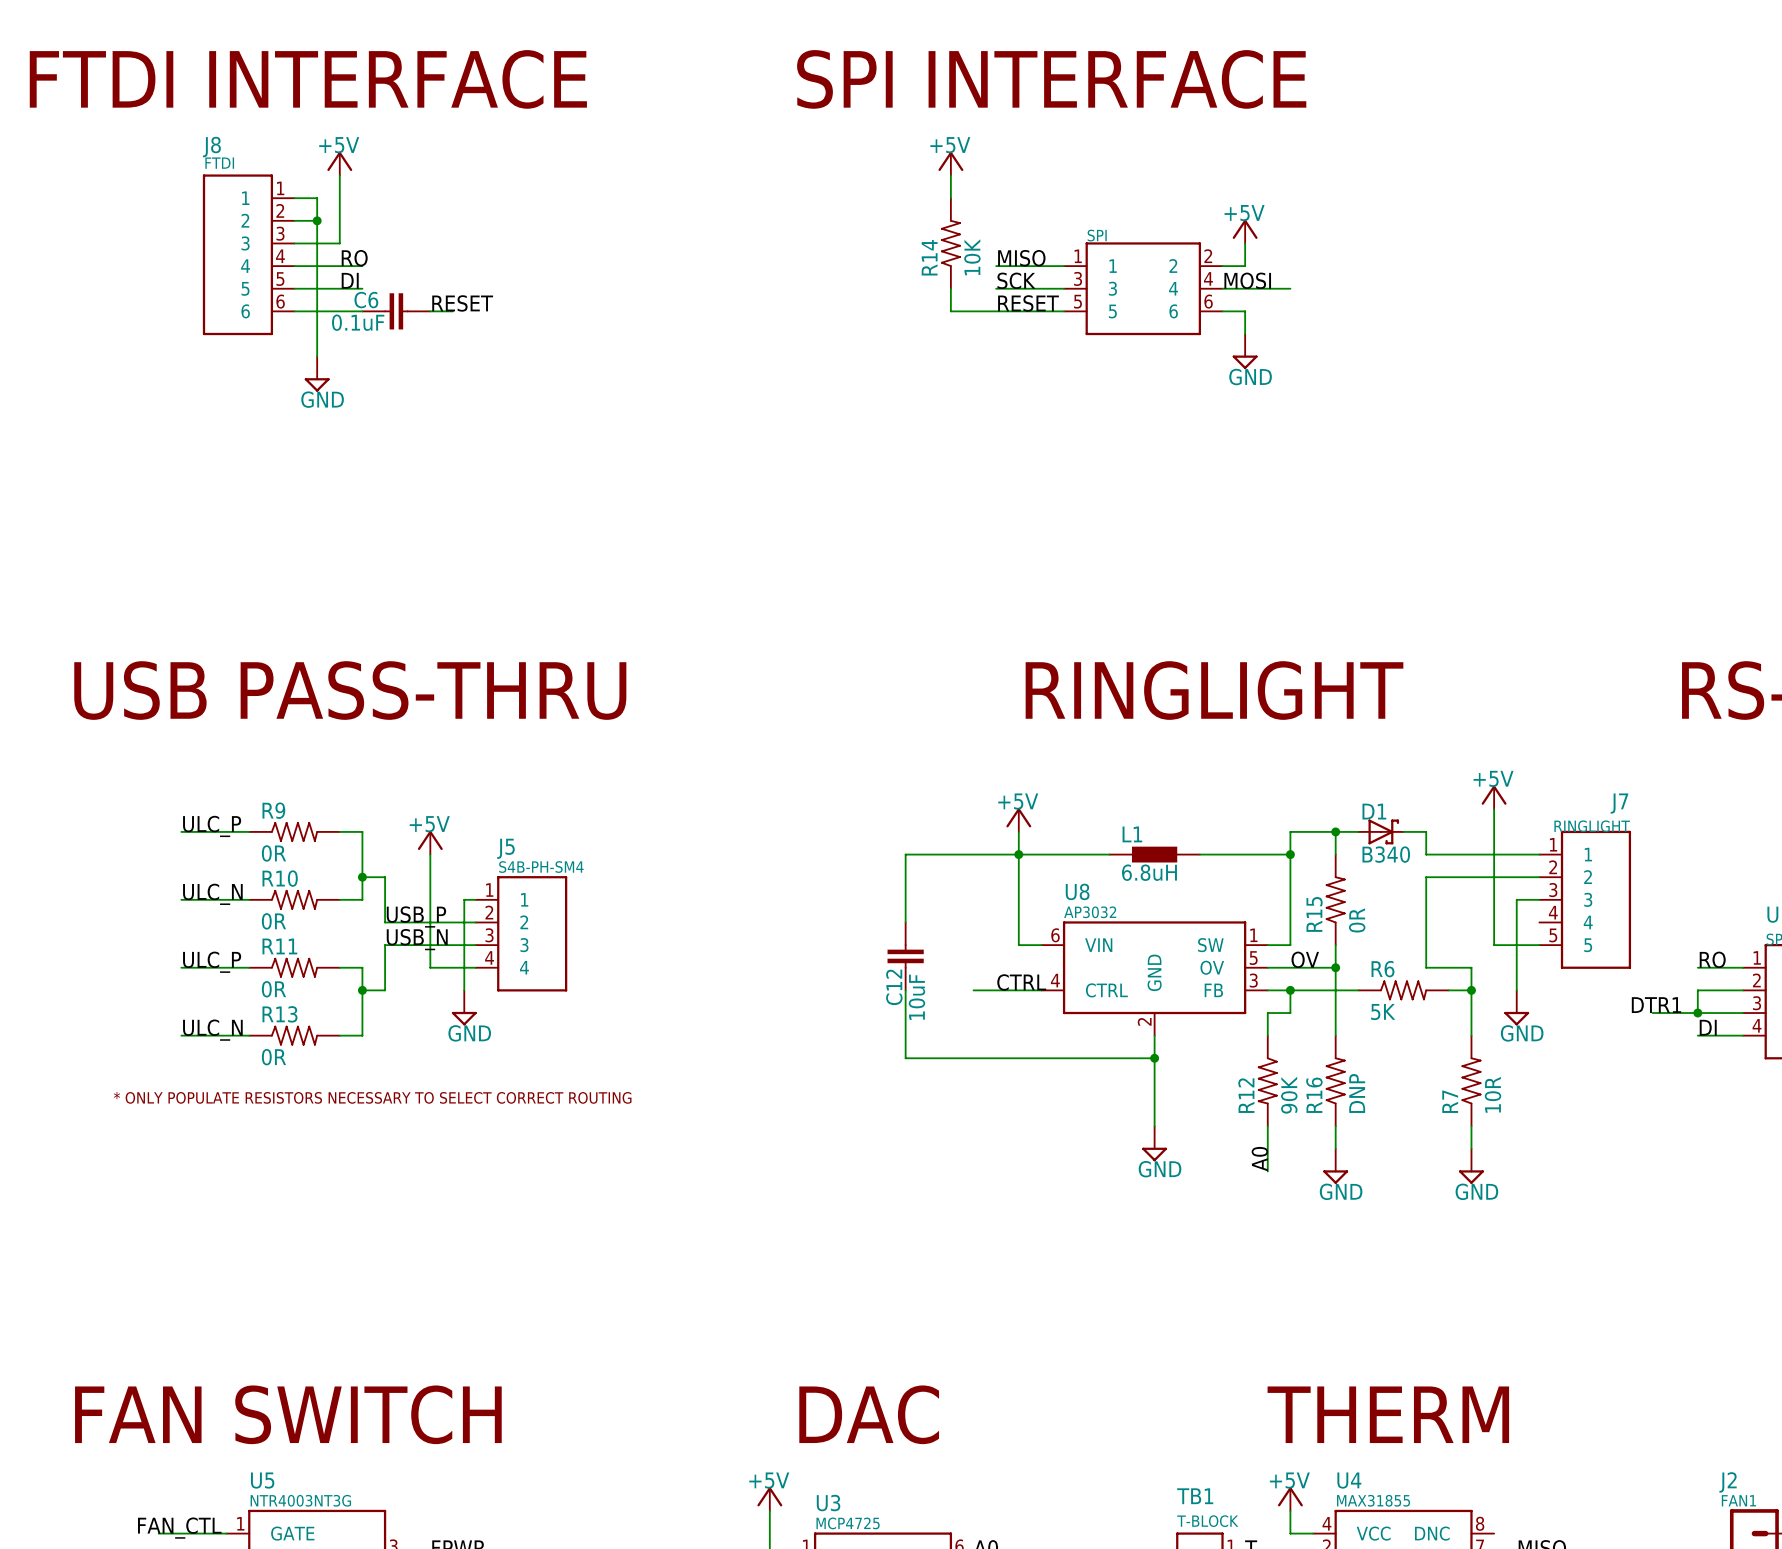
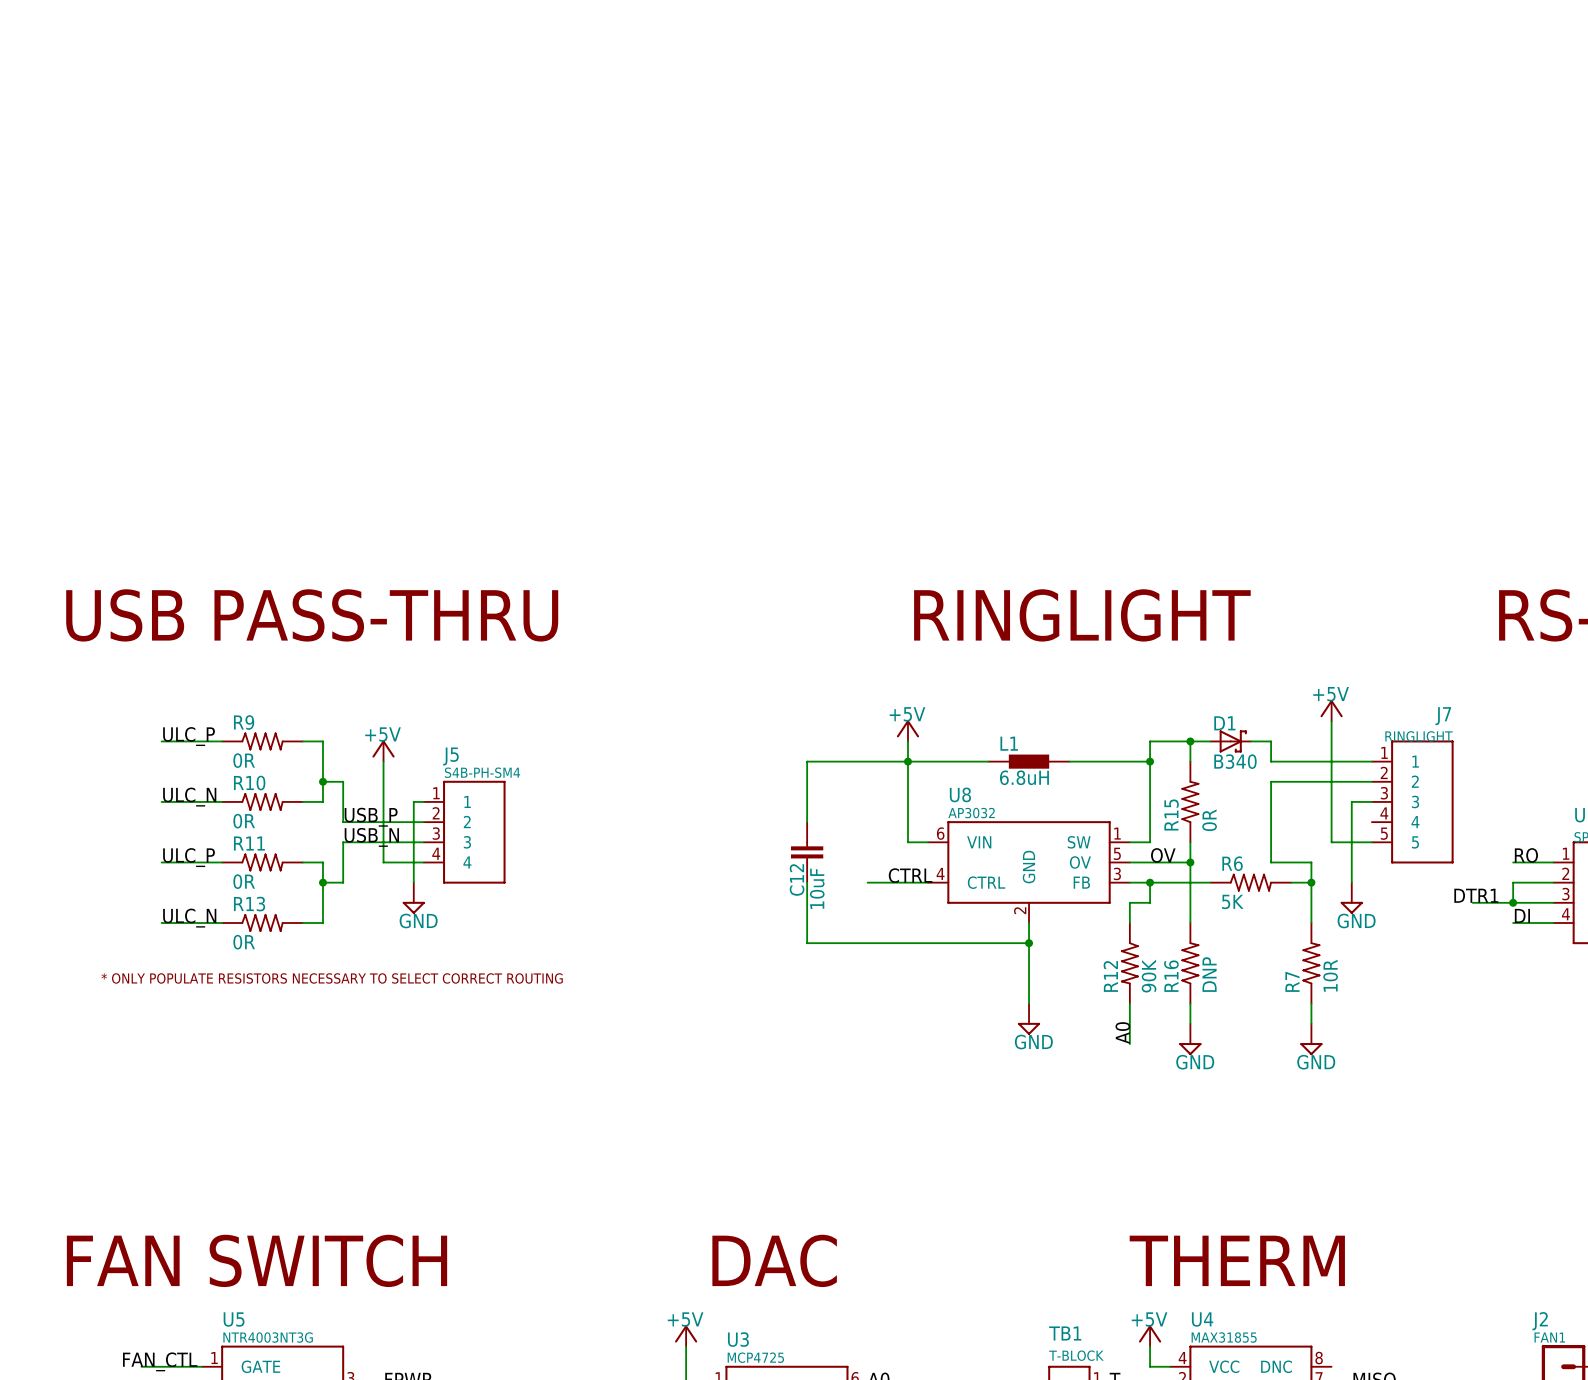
text: FTDI INTERFACE (308, 79) -> none
text: SPI INTERFACE (1051, 79) -> none
power symbol: +5V (339, 163) -> none
power symbol: +5V (950, 163) -> none
wire: (339, 175) (339, 243) (294, 243) -> none
wire: (950, 175) (950, 198) -> none
wire: (294, 198) (317, 198) (317, 356) -> none
wire: (294, 220) (317, 220) -> none
junction: (317, 220) -> none
power symbol: +5V (1245, 231) -> none
text: SPI (1097, 235) -> none
R14: 10K (950, 243) -> none
wire: (1245, 243) (1245, 266) (1222, 266) -> none
J8: FTDI (248, 254) -> none
label: RO (354, 258) -> none
label: MISO (1021, 258) -> none
wire: (294, 266) (362, 266) -> none
wire: (996, 266) (1064, 266) -> none
label: DI (350, 280) -> none
label: SCK (1016, 280) -> none
label: MOSI (1247, 280) -> none
wire: (294, 288) (362, 288) -> none
wire: (950, 288) (950, 311) (1064, 311) -> none
wire: (996, 288) (1064, 288) -> none
part: (1143, 288) -> none
wire: (1222, 288) (1290, 288) -> none
label: RESET (462, 303) -> none
label: RESET (1028, 303) -> none
wire: (294, 311) (362, 311) -> none
C6: 0.1uF (396, 311) -> none
wire: (430, 311) (452, 311) -> none
wire: (1222, 311) (1245, 311) (1245, 334) -> none
power symbol: GND (1245, 351) -> none
power symbol: GND (317, 374) -> none

